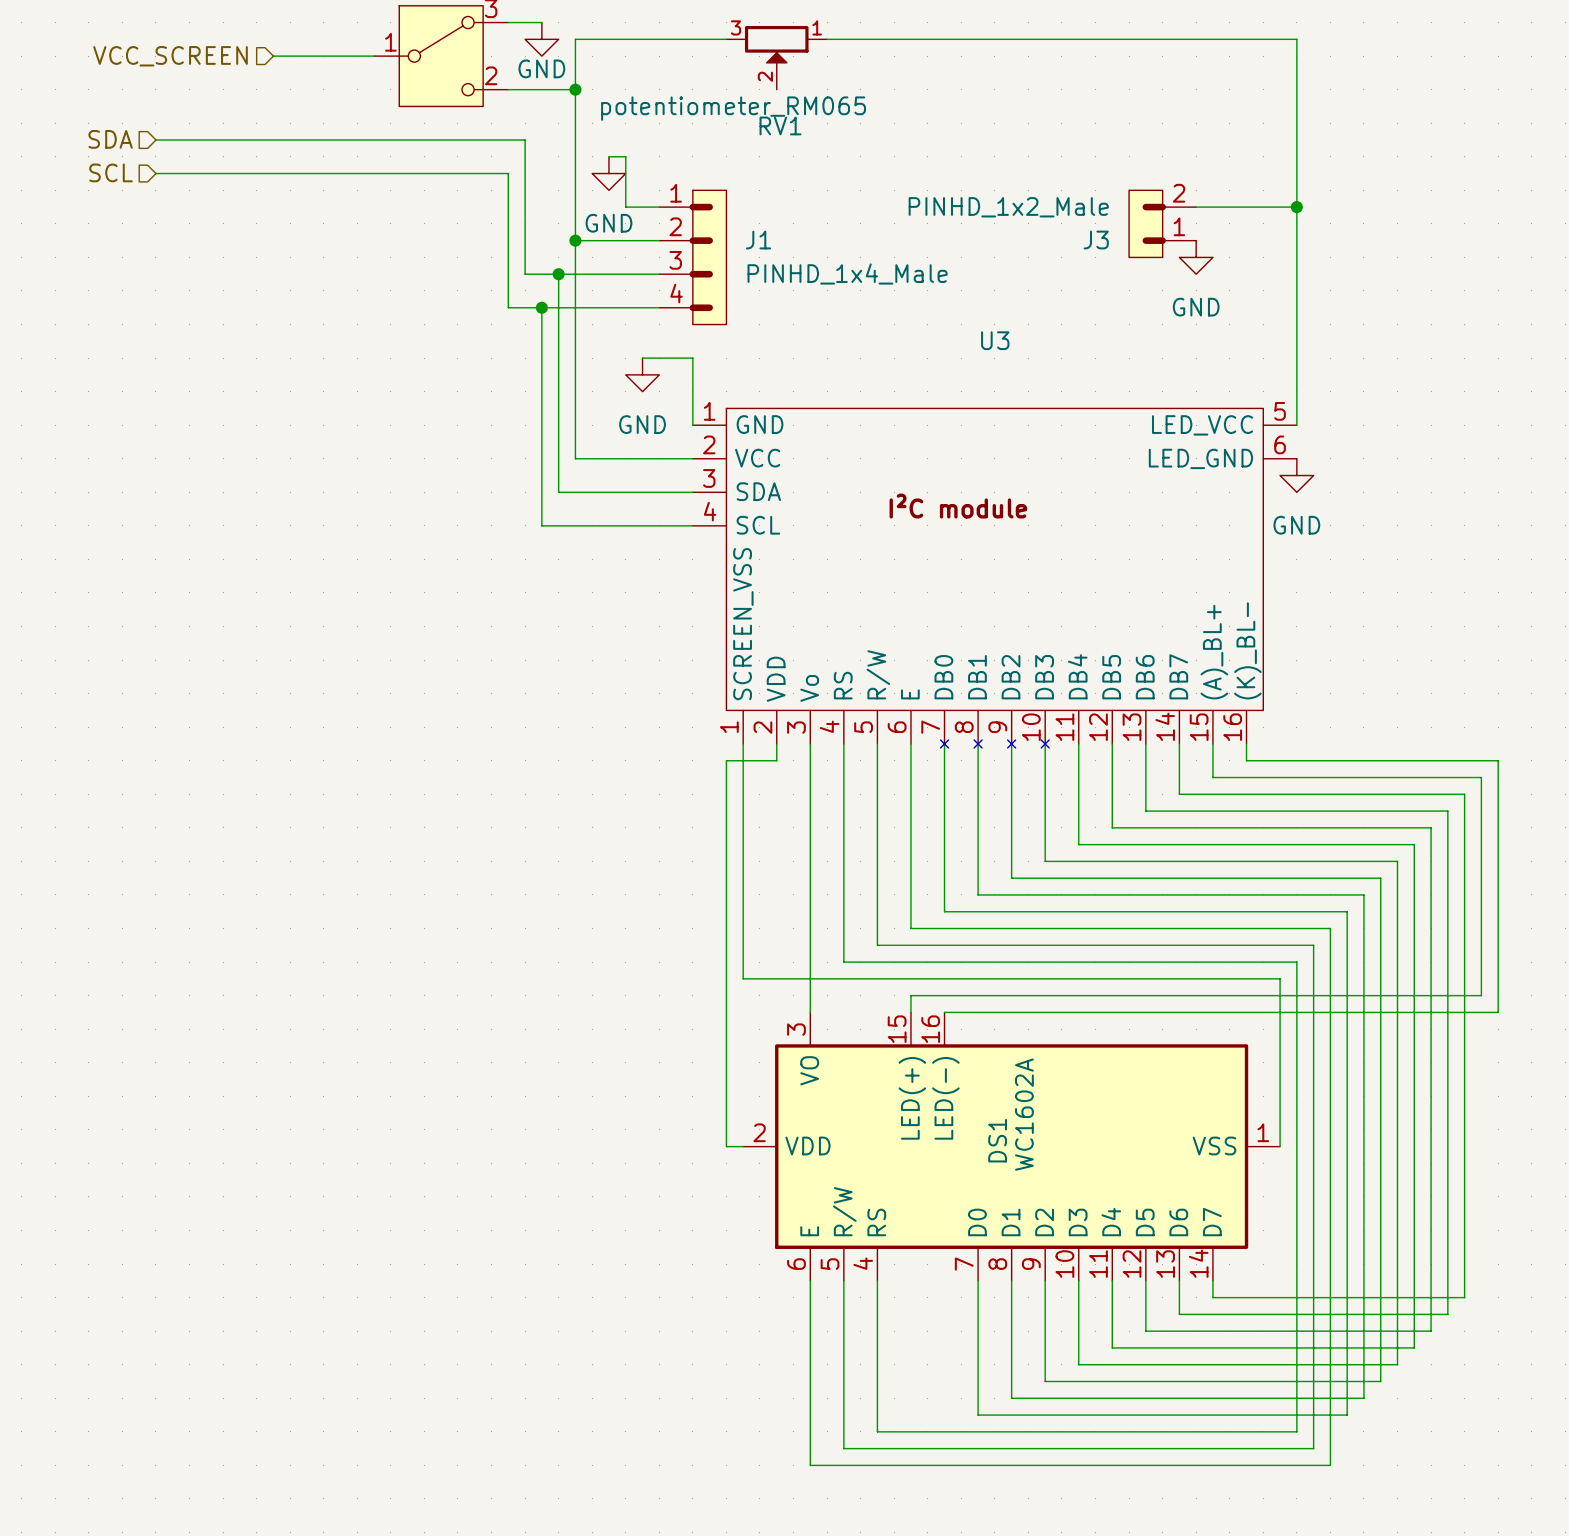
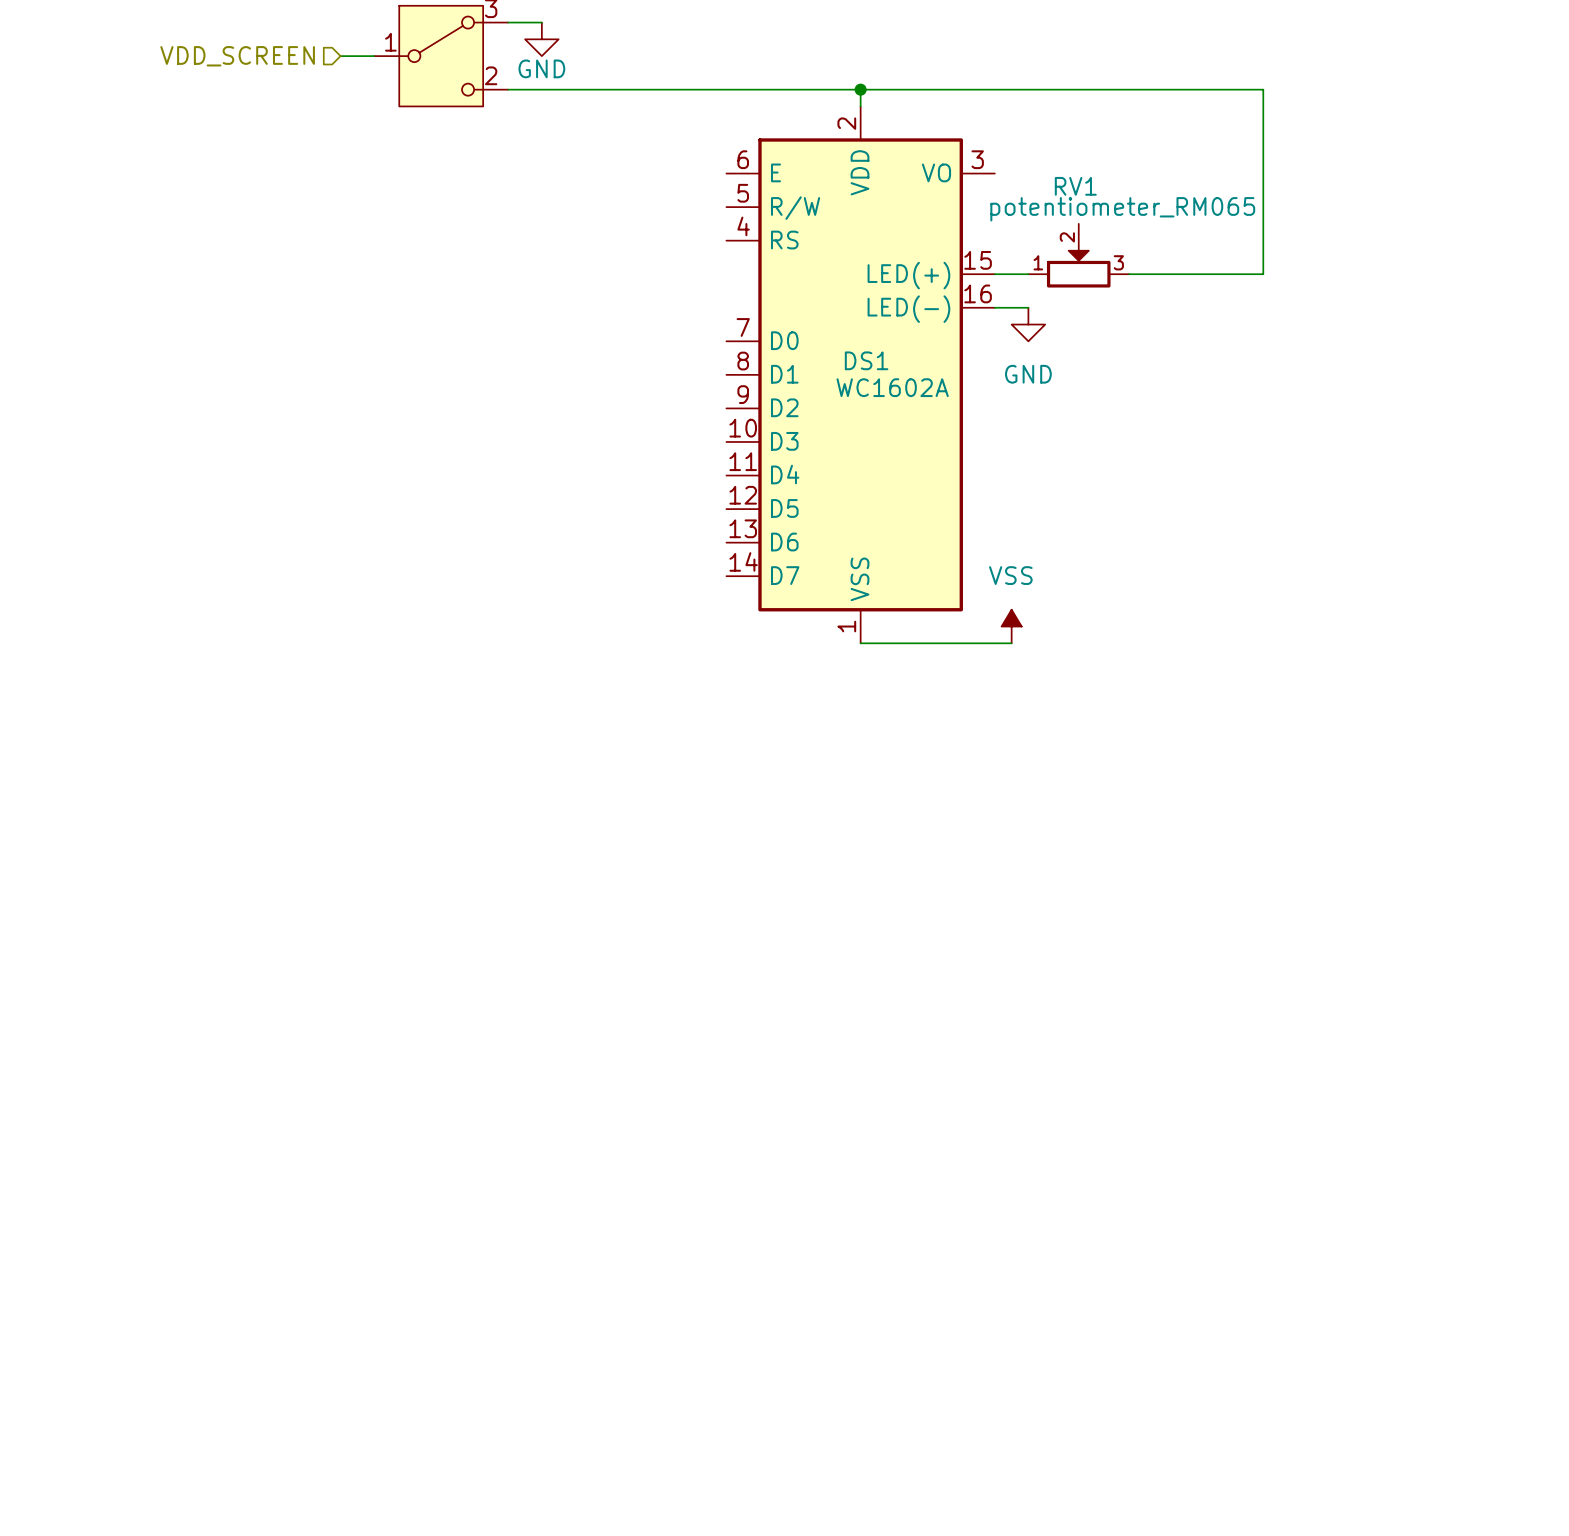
wire: (726, 39) (575, 39) (575, 458) (692, 458) -> none
wire: (827, 39) (1296, 39) (1296, 425) -> none
RV1 rotation: 0° (776, 44) -> 180° (1078, 269)
hierarchical label: VCC_SCREEN (170, 56) -> VDD_SCREEN (237, 56)
wire: (273, 56) (340, 56) -> none
RV1 position: (776, 57) -> (1078, 255)
wire: none -> (575, 89) (1263, 89) (1263, 274) (1129, 274)
junction: (575, 89) -> none
wire: none -> (860, 89) (860, 106)
junction: none -> (860, 89)
hierarchical label: SDA (110, 139) -> none
wire: (155, 139) (525, 139) (525, 274) (659, 274) -> none
wire: (608, 156) (625, 156) (625, 207) (659, 207) -> none
hierarchical label: SCL (110, 172) -> none
wire: (155, 173) (508, 173) (508, 307) (659, 307) -> none
power symbol: GND (608, 173) -> none
wire: (1196, 207) (1296, 207) -> none
junction: (1296, 207) -> none
J3: PINHD_1x2_Male (1162, 223) -> none
wire: (575, 240) (659, 240) -> none
junction: (575, 240) -> none
J1: PINHD_1x4_Male (692, 257) -> none
power symbol: GND (1196, 257) -> none
wire: (558, 274) (558, 492) (692, 492) -> none
junction: (558, 274) -> none
wire: none -> (994, 274) (1028, 274)
wire: (541, 307) (541, 525) (692, 525) -> none
junction: (541, 307) -> none
wire: none -> (994, 307) (1028, 307)
power symbol: none -> GND (1028, 324)
wire: (642, 358) (692, 358) (692, 425) -> none
power symbol: GND (642, 374) -> none
power symbol: GND (1296, 475) -> none
U3: (994, 578) -> none
power symbol: none -> VSS (1011, 626)
wire: none -> (860, 643) (1011, 643)
wire: (743, 743) (743, 978) (1280, 978) (1280, 1146) -> none
wire: (776, 743) (776, 760) (726, 760) (726, 1146) (743, 1146) -> none
wire: (810, 743) (810, 1012) -> none
wire: (843, 743) (843, 962) (1296, 962) (1296, 1431) (877, 1431) (877, 1280) -> none
wire: (877, 743) (877, 945) (1313, 945) (1313, 1448) (843, 1448) (843, 1280) -> none
wire: (910, 743) (910, 928) (1330, 928) (1330, 1465) (810, 1465) (810, 1280) -> none
wire: (944, 743) (944, 911) (1347, 911) (1347, 1415) (978, 1415) (978, 1280) -> none
wire: (978, 743) (978, 894) (1363, 894) (1363, 1398) (1011, 1398) (1011, 1280) -> none
wire: (1011, 743) (1011, 878) (1380, 878) (1380, 1381) (1045, 1381) (1045, 1280) -> none
wire: (1045, 743) (1045, 861) (1397, 861) (1397, 1364) (1078, 1364) (1078, 1280) -> none
wire: (1078, 743) (1078, 844) (1414, 844) (1414, 1347) (1112, 1347) (1112, 1280) -> none
wire: (1112, 743) (1112, 827) (1431, 827) (1431, 1331) (1145, 1331) (1145, 1280) -> none
wire: (1145, 743) (1145, 811) (1447, 811) (1447, 1314) (1179, 1314) (1179, 1280) -> none
wire: (1179, 743) (1179, 794) (1464, 794) (1464, 1297) (1212, 1297) (1212, 1280) -> none
wire: (1212, 743) (1212, 777) (1481, 777) (1481, 995) (910, 995) (910, 1012) -> none
wire: (1246, 743) (1246, 760) (1498, 760) (1498, 1012) (944, 1012) -> none
DS1 rotation: 0° (1011, 1146) -> 90° clockwise (860, 374)
DS1 position: (1011, 1146) -> (860, 374)

